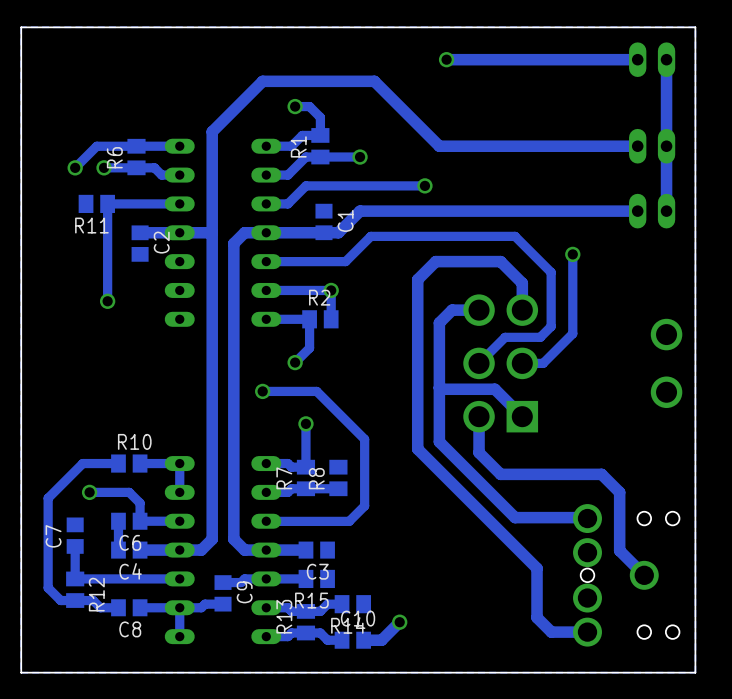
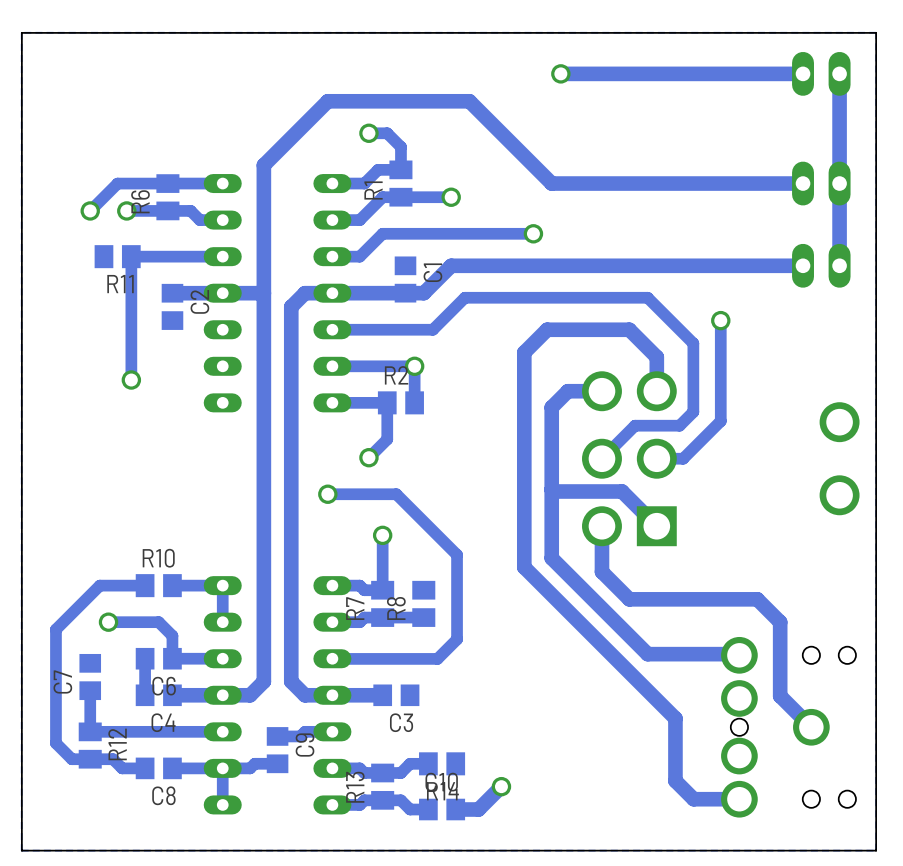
track: (305, 578) (266, 578) -> none
R15: (316, 578) -> none

